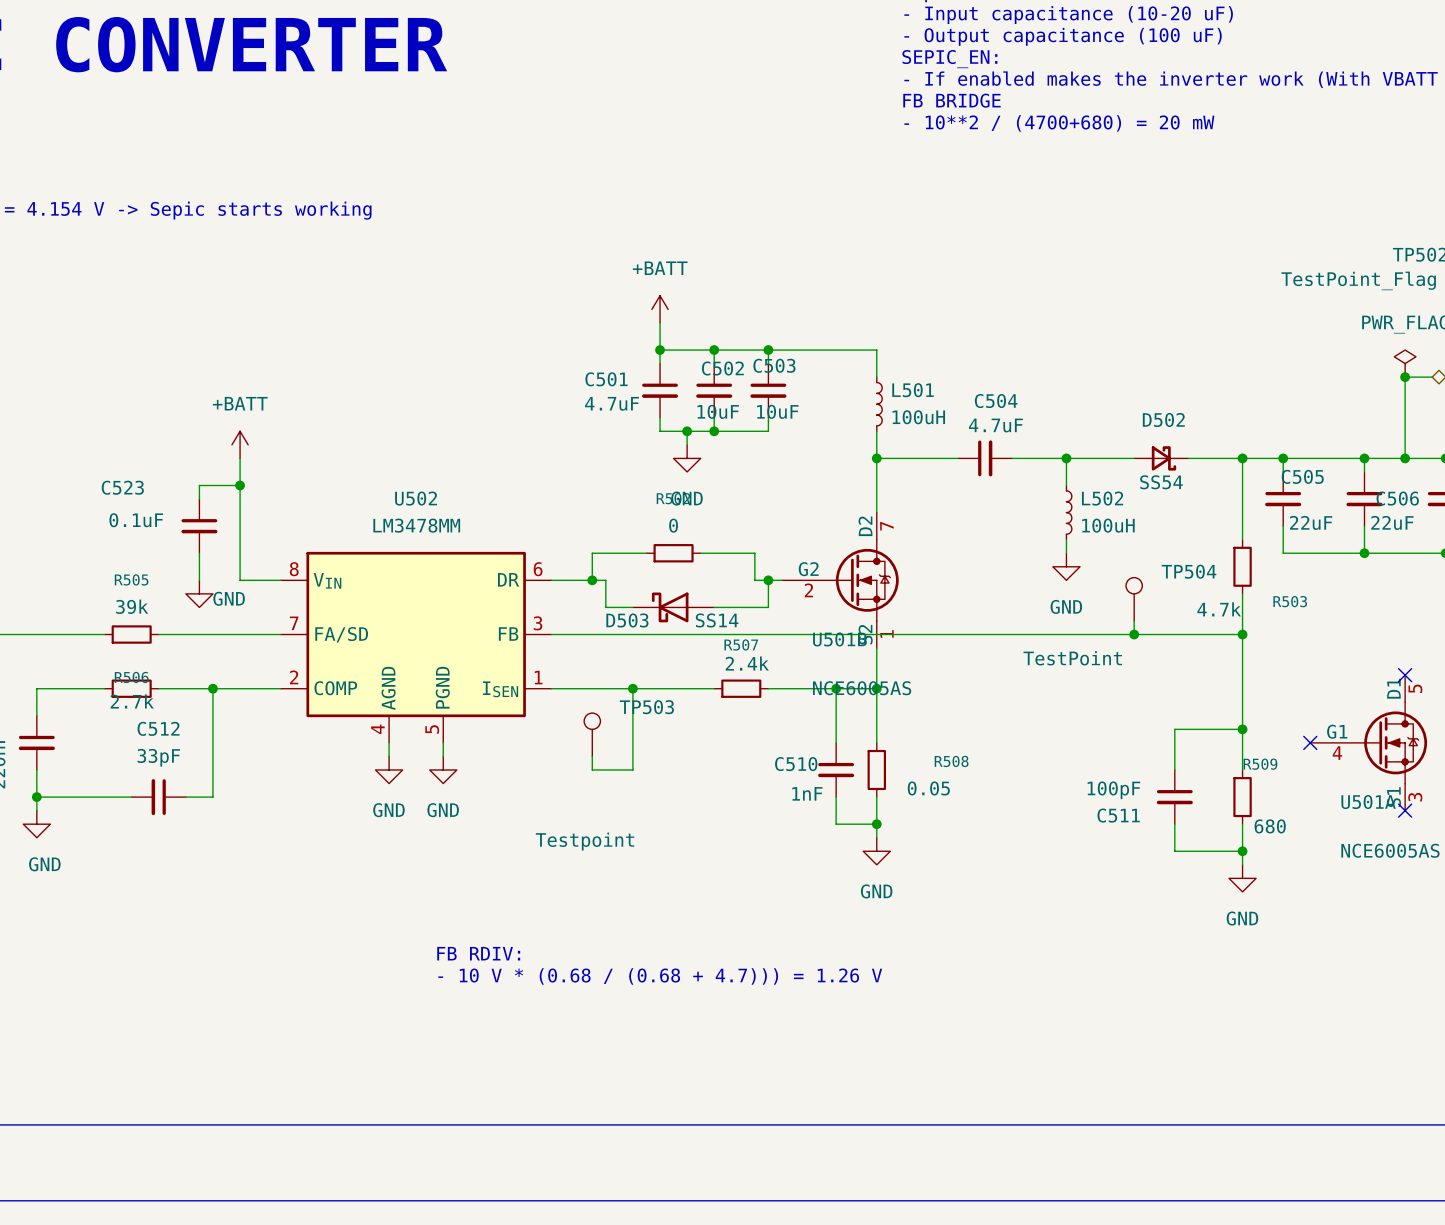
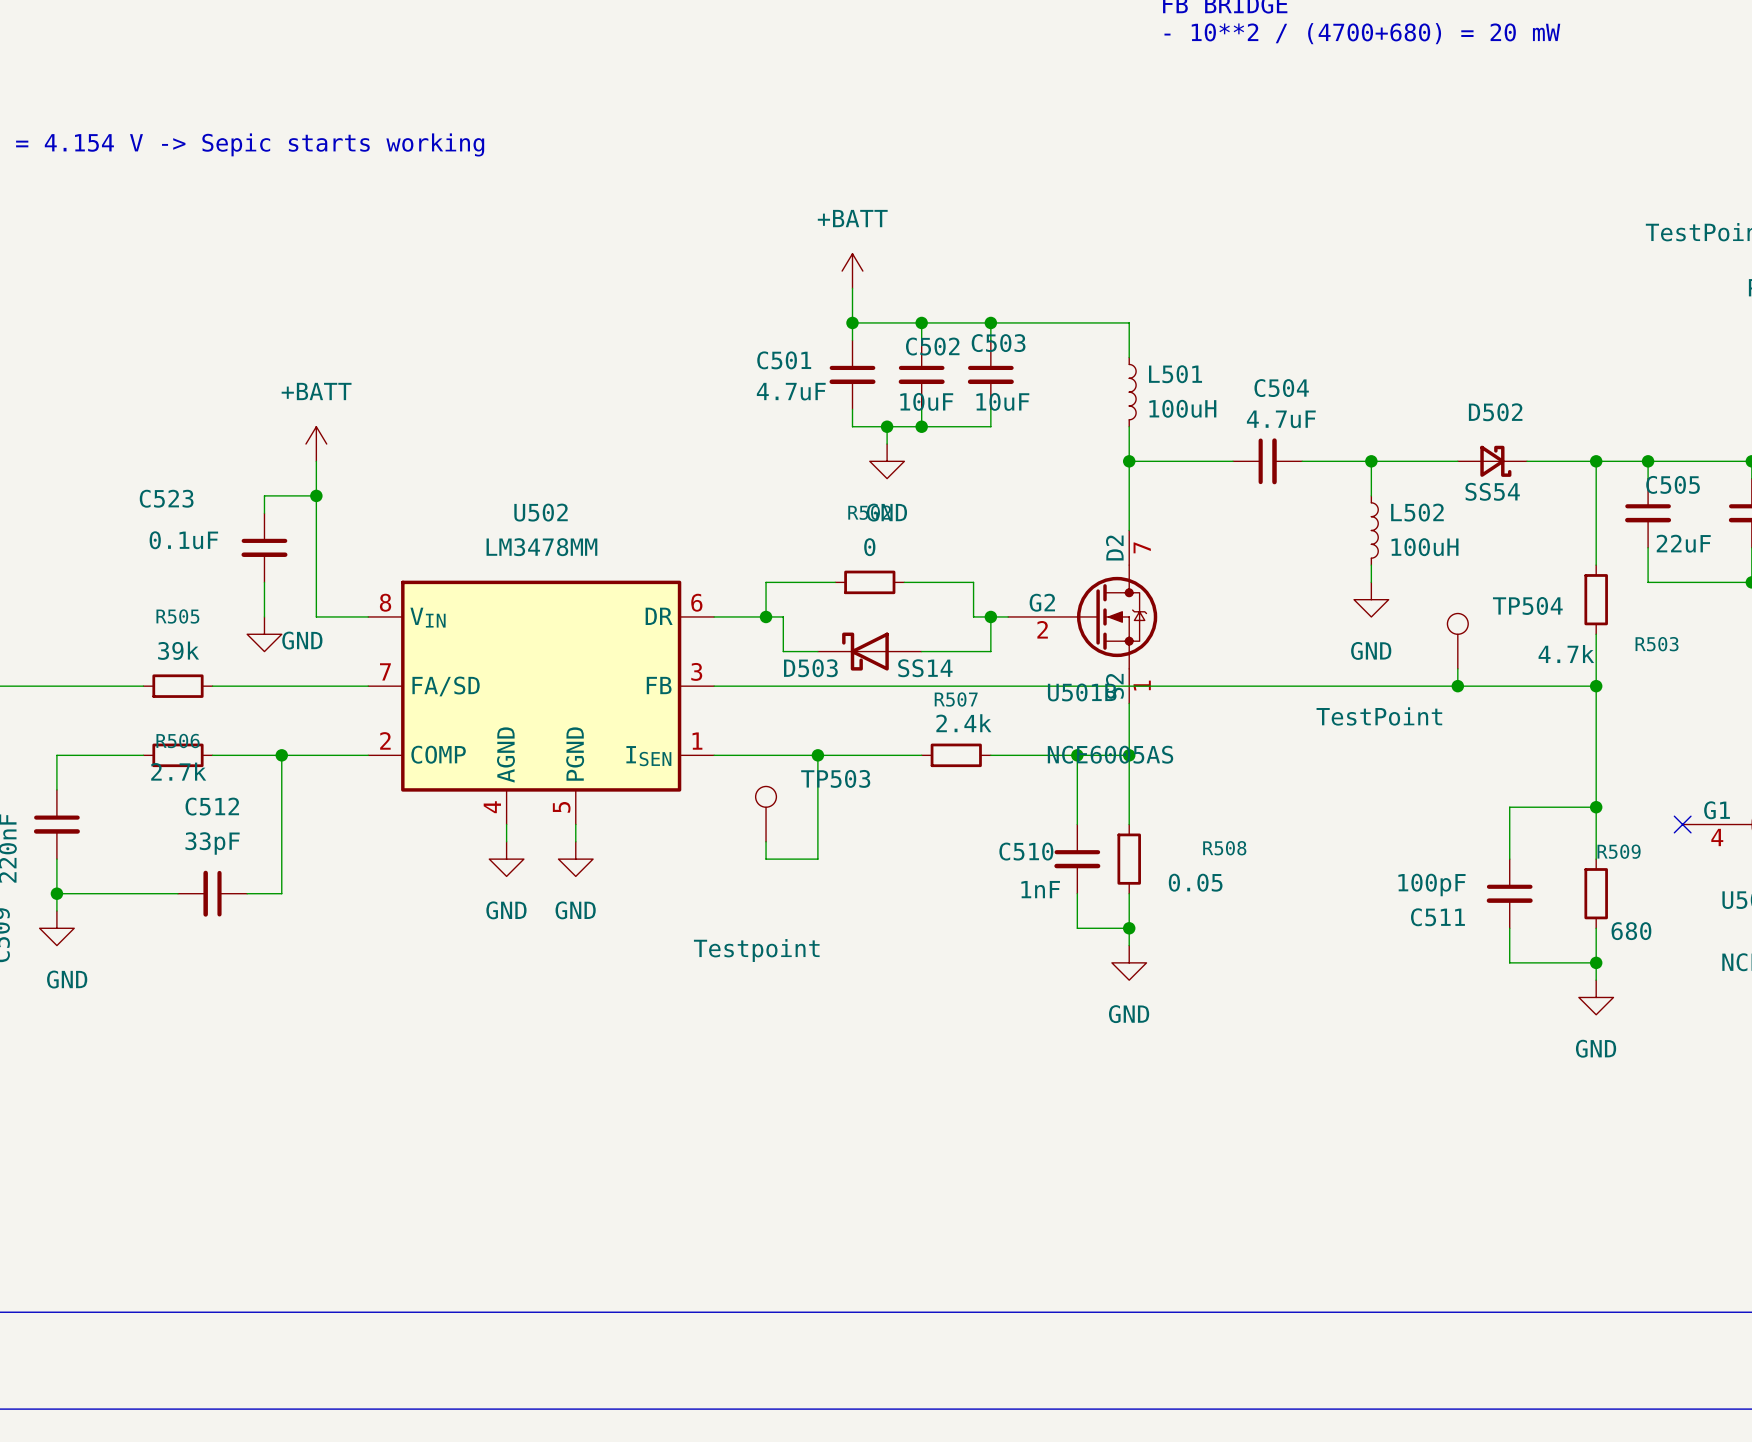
text: FB RDIV: (478, 953) -> none
text: - 10 V * (0.68 / (0.68 + 4.7))) = 1.26 V (660, 976) -> none

